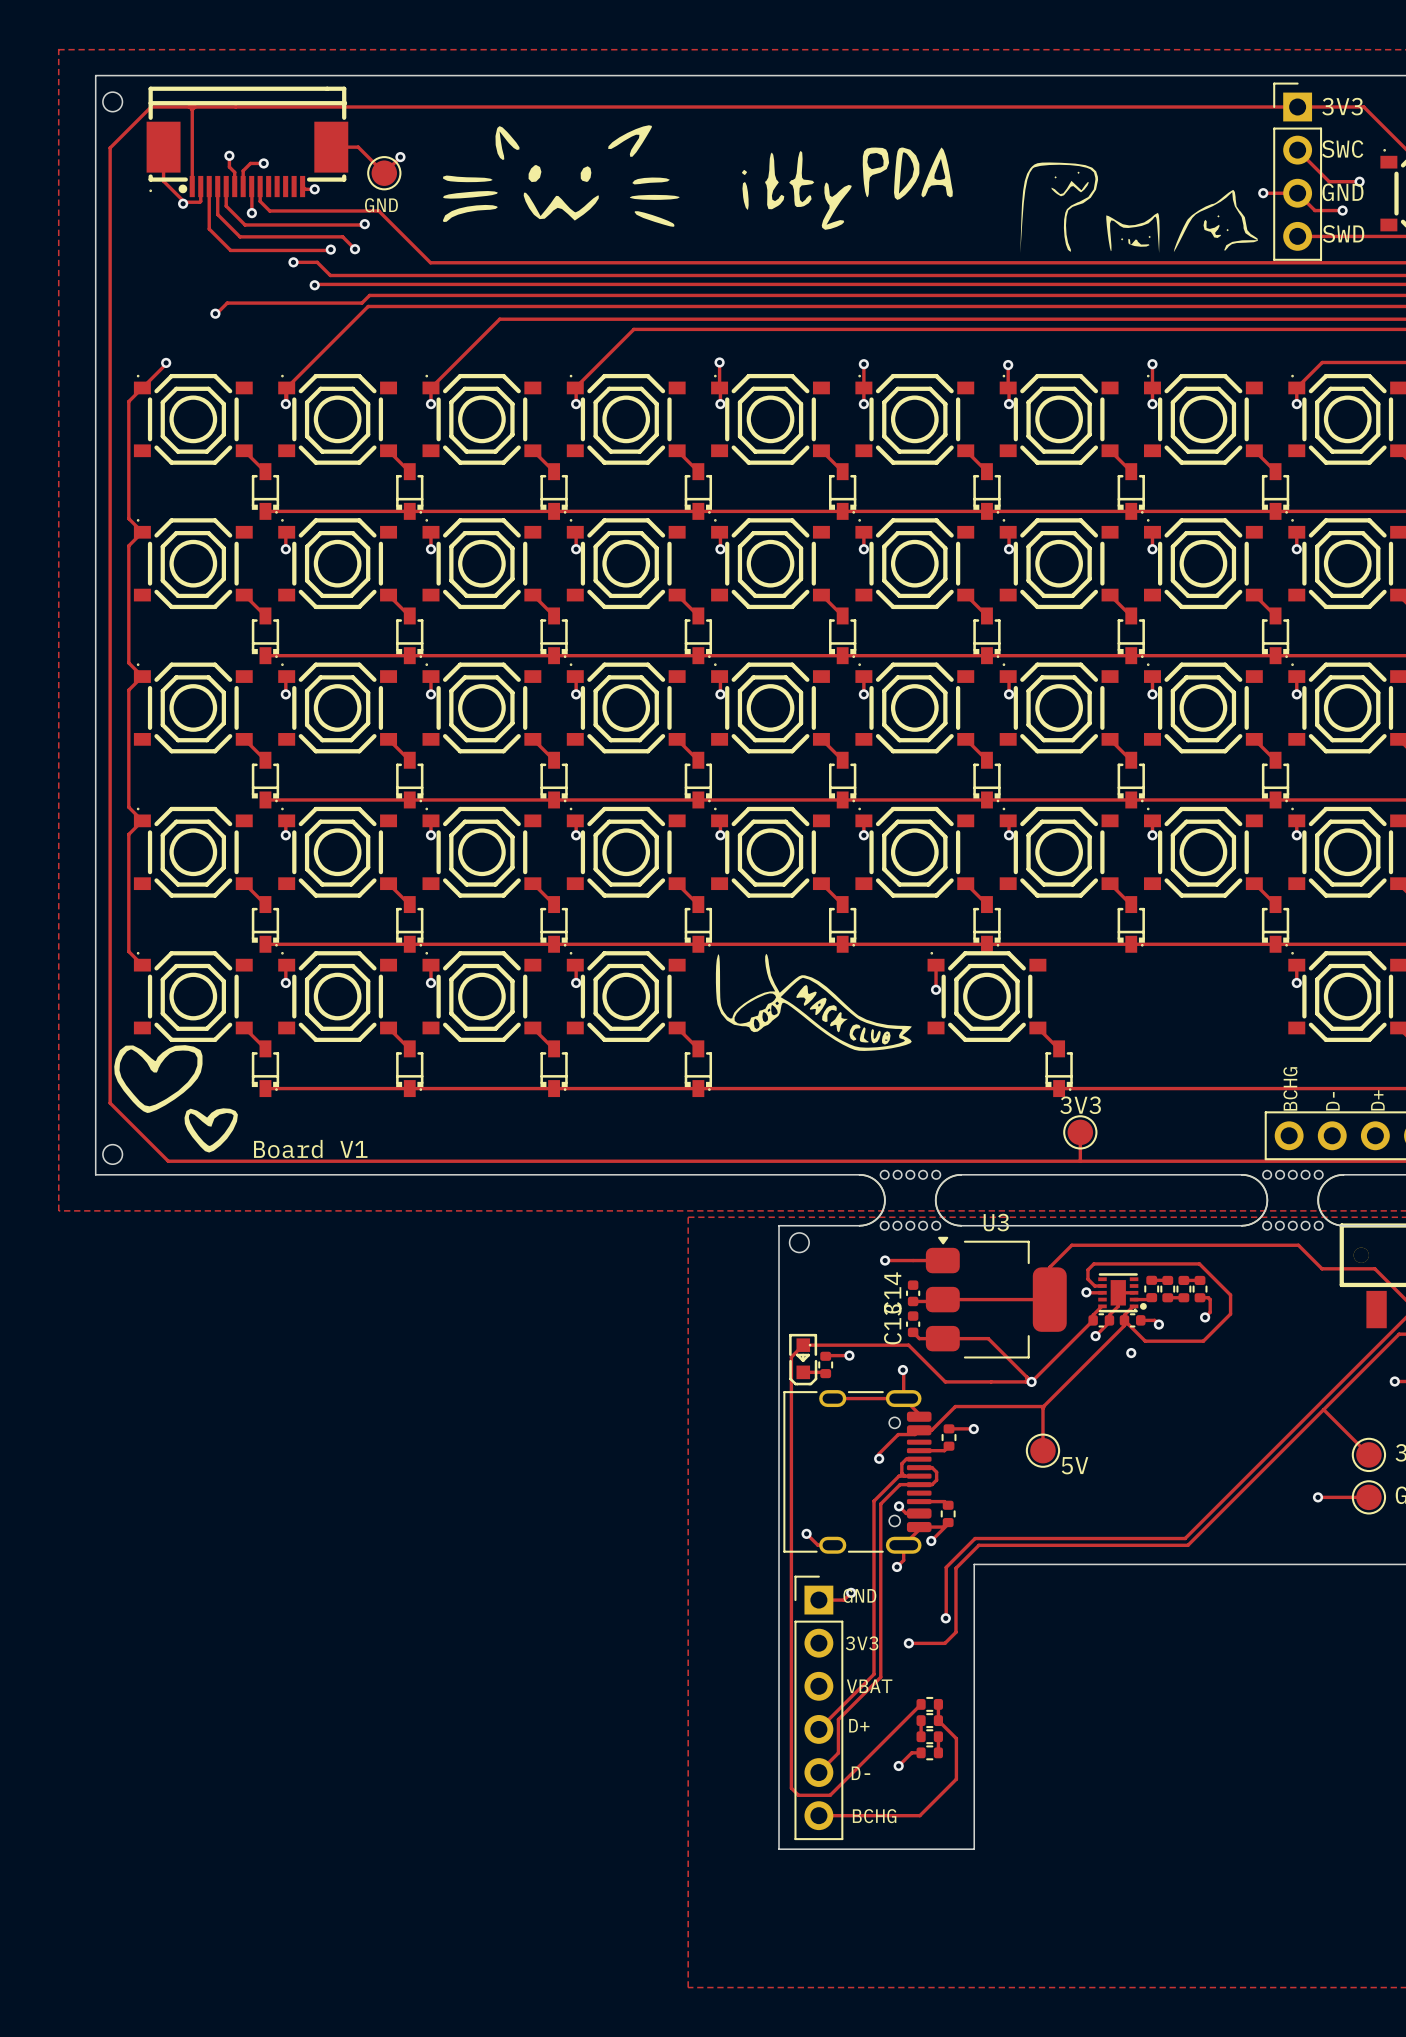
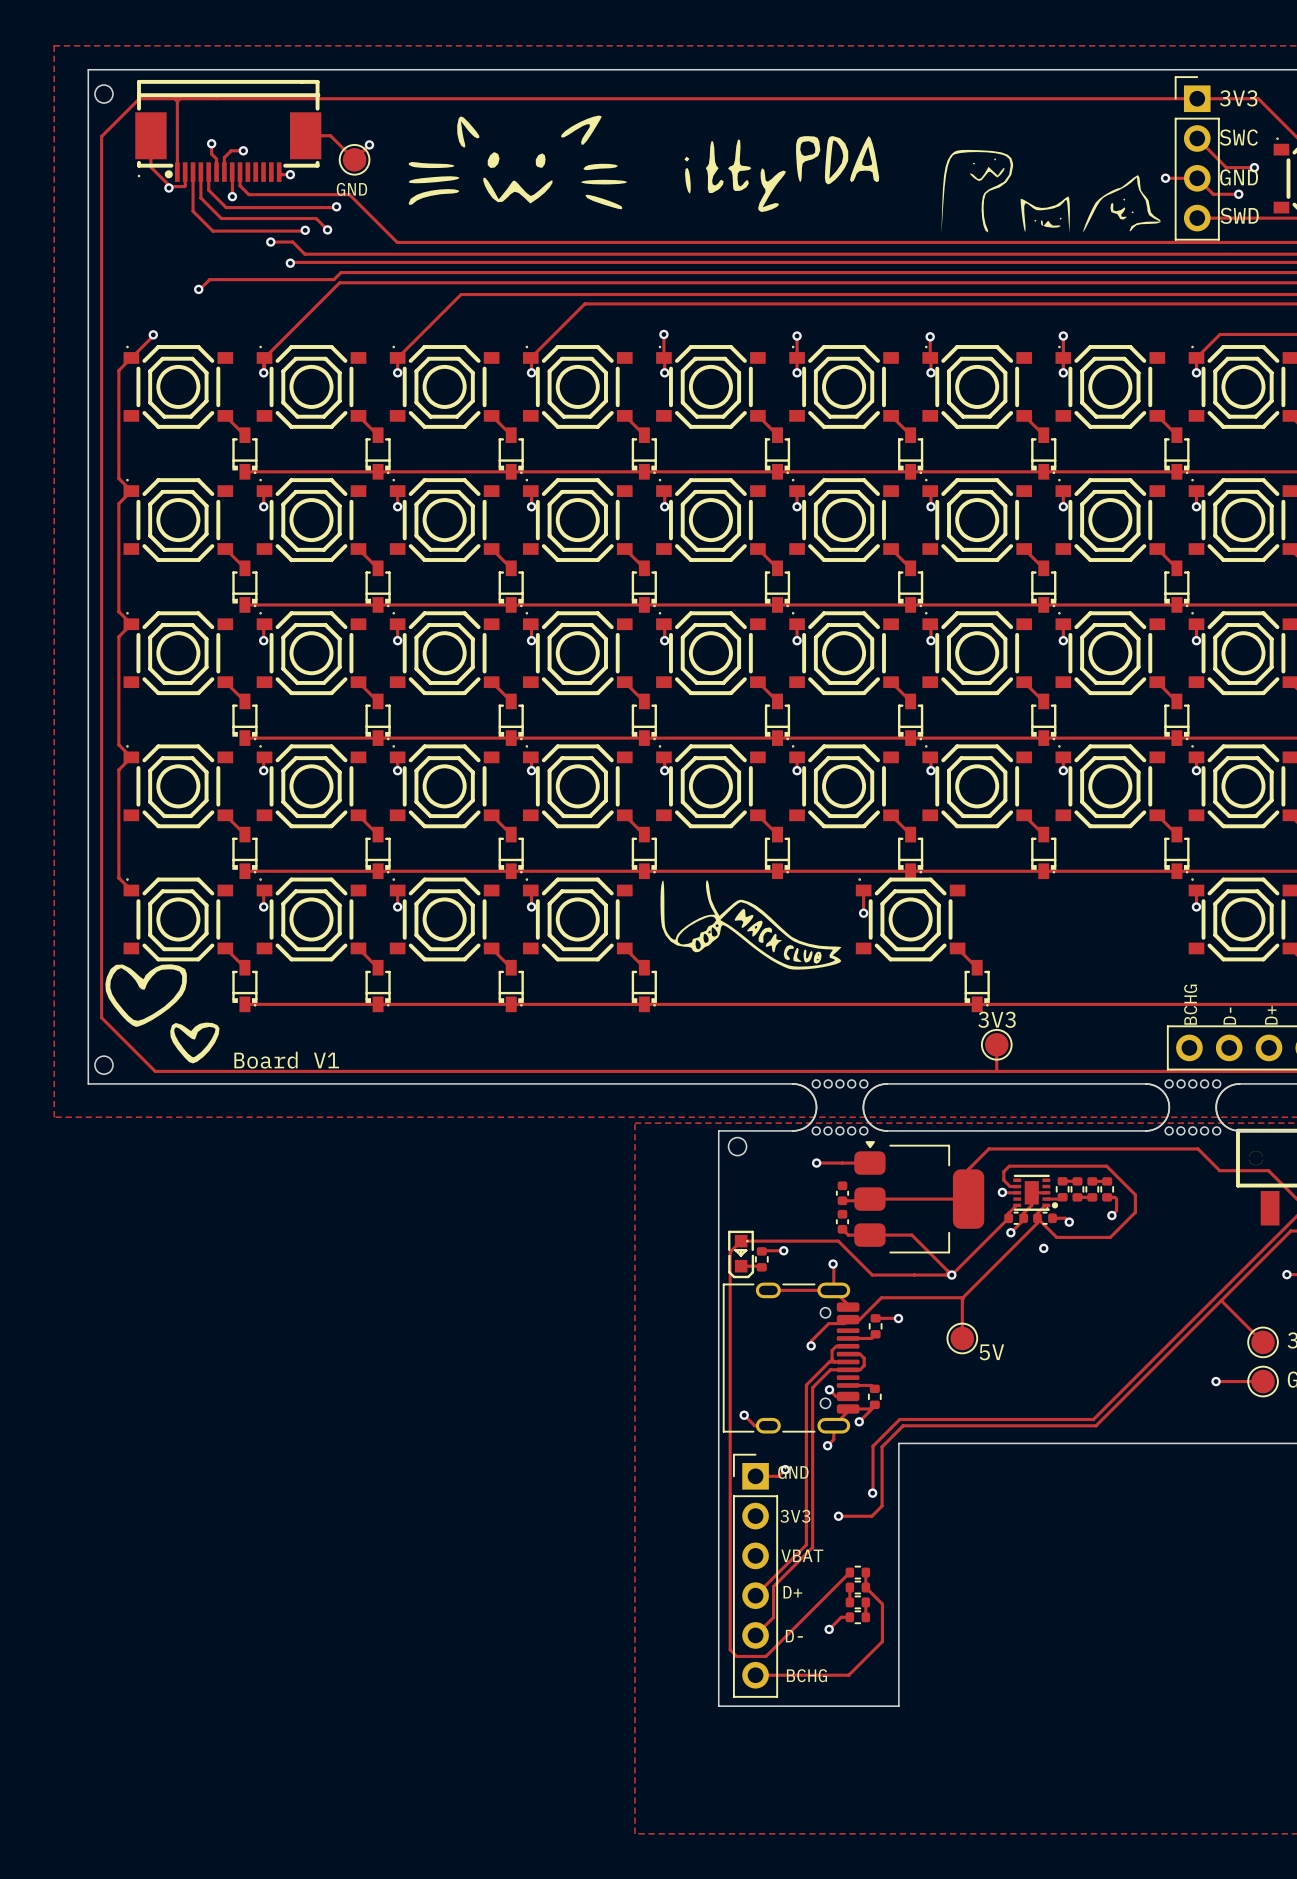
U3 name: U3 (996, 1222) -> none
C14 name: C14 (892, 1292) -> none
C13 name: C13 (892, 1324) -> none

